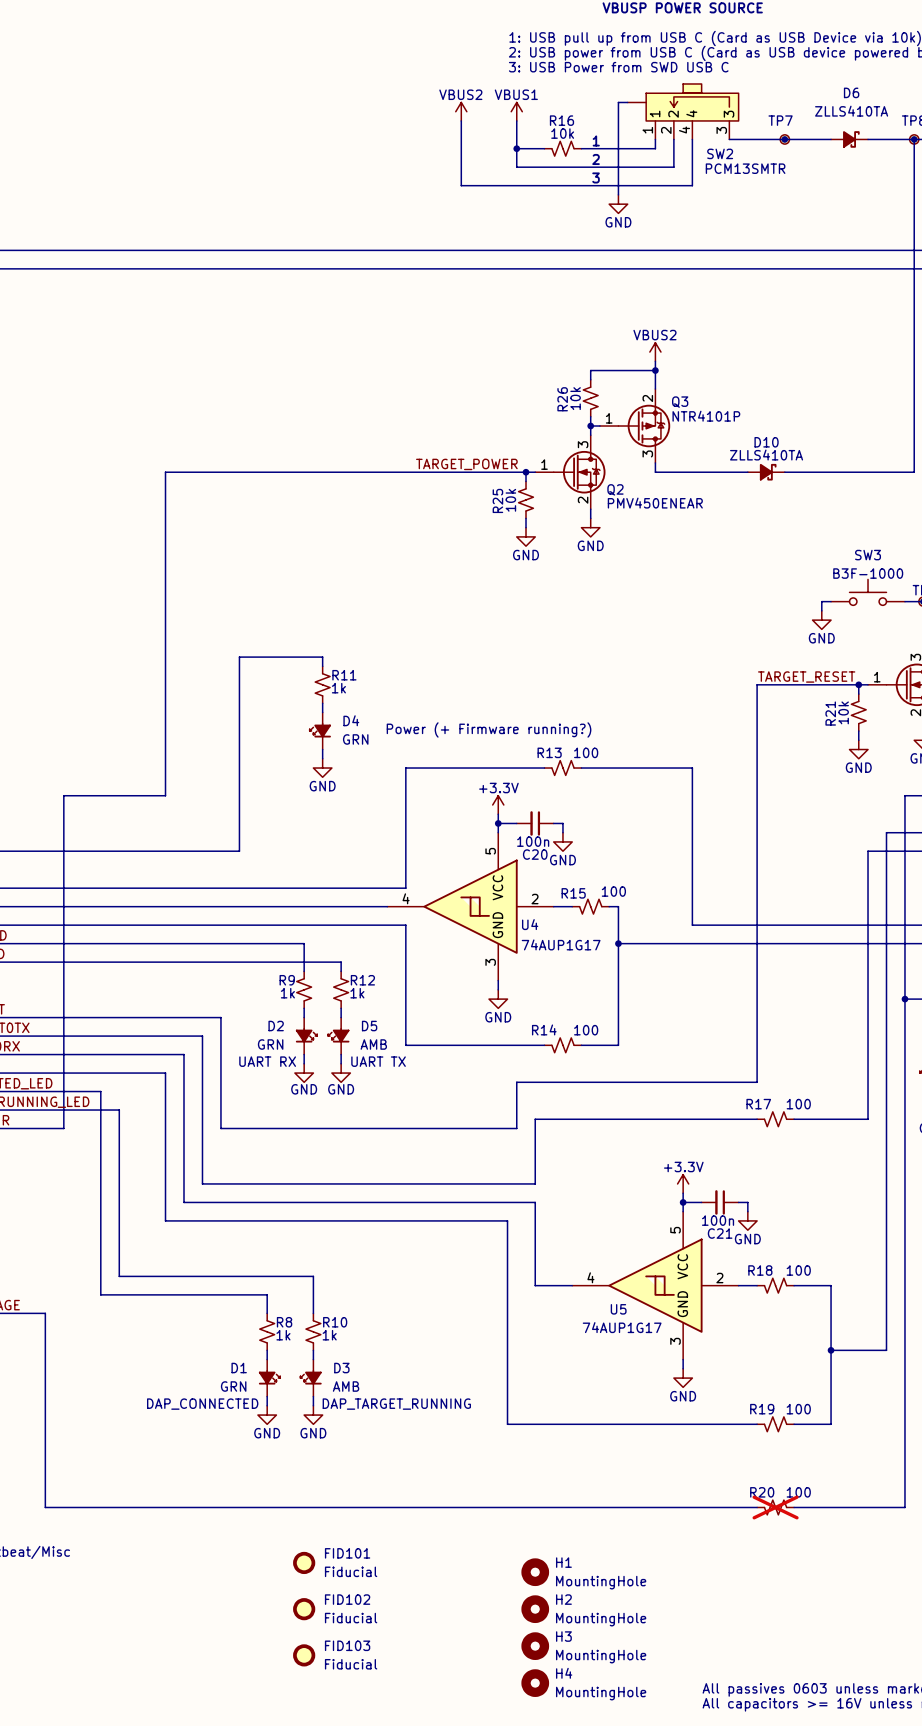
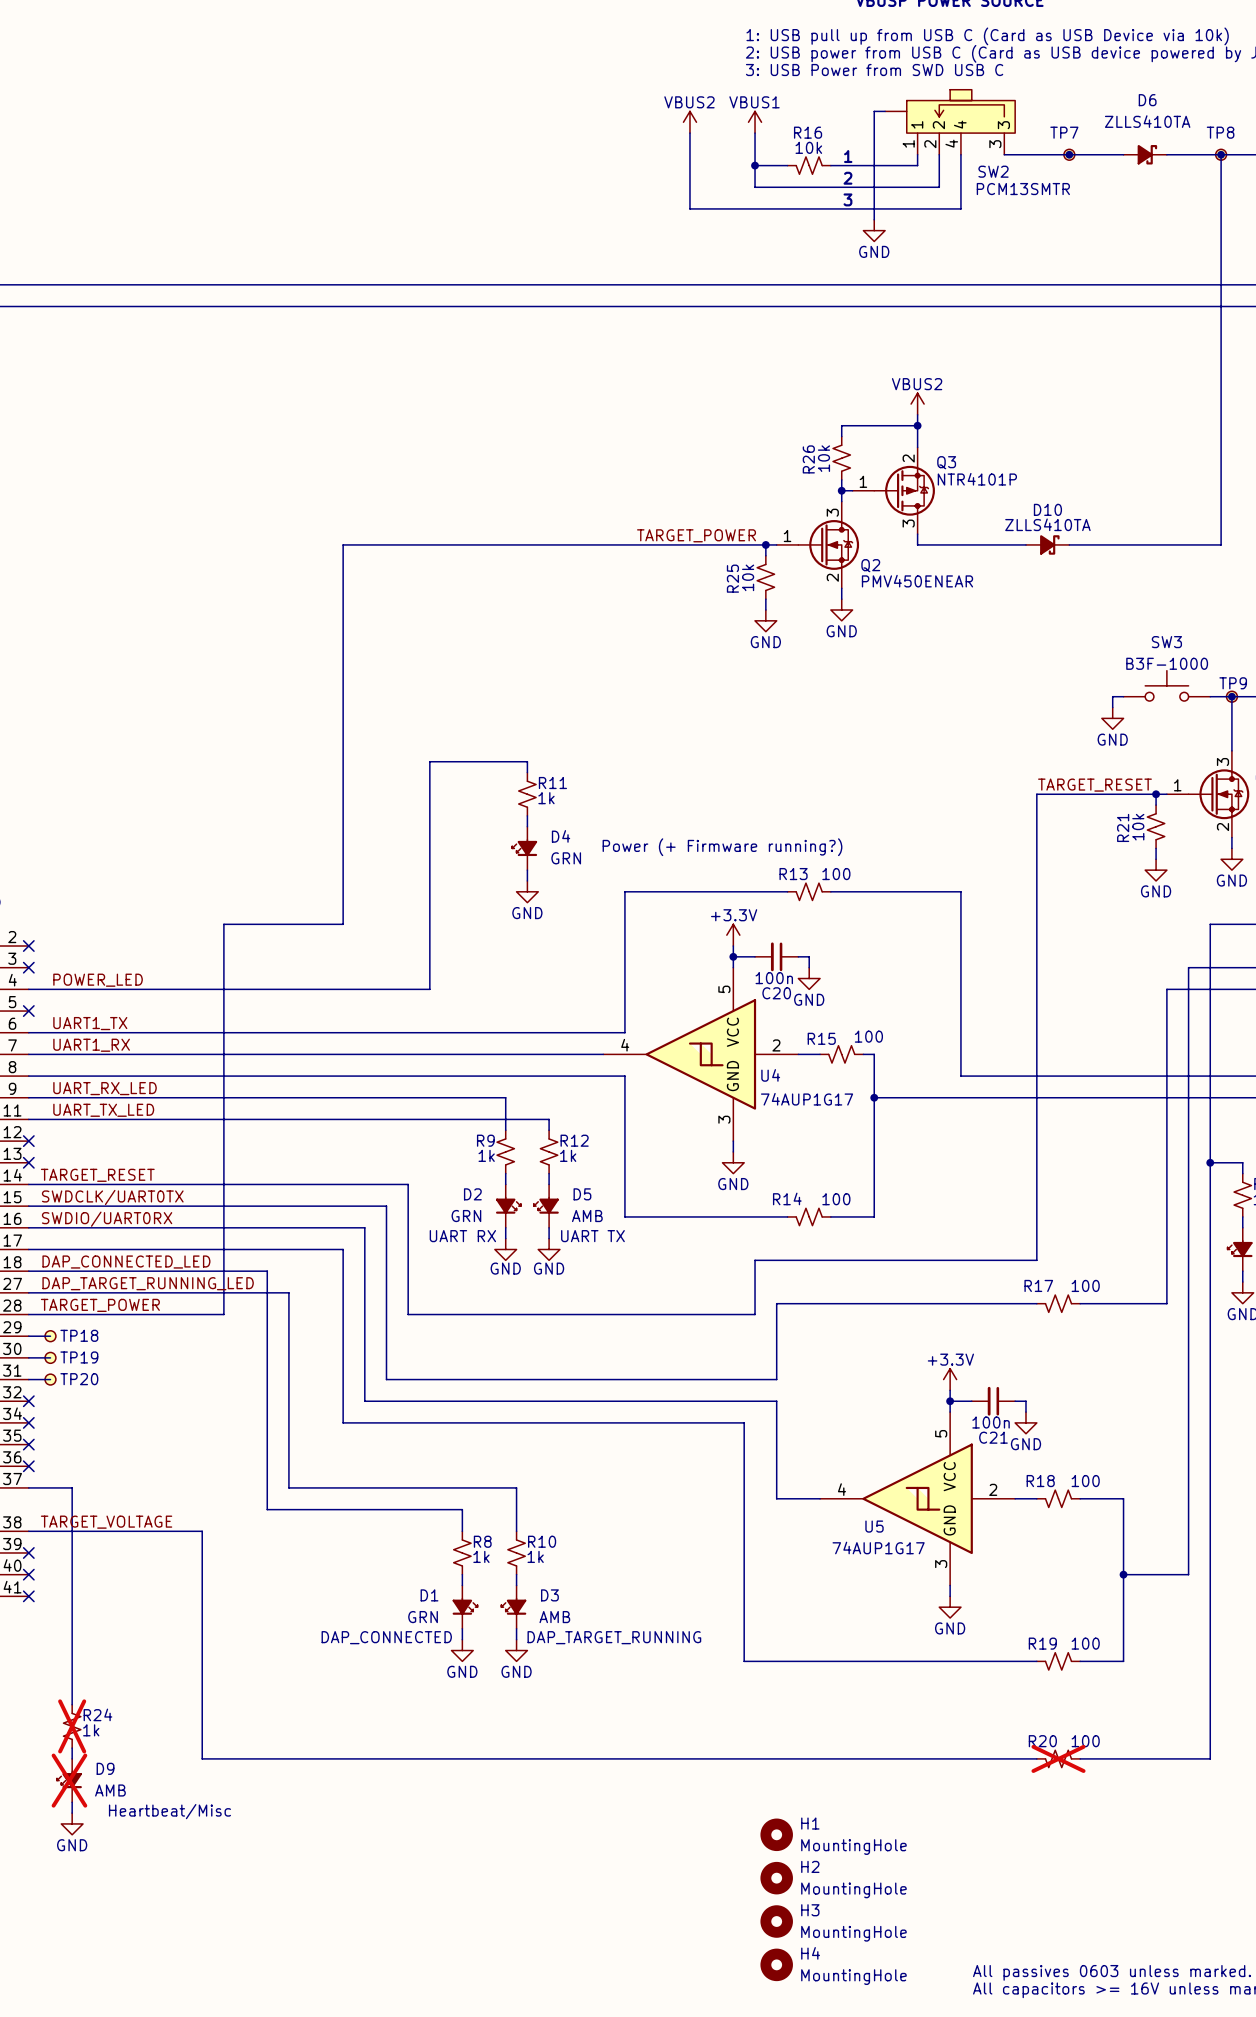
FID101: Fiducial (304, 1562) -> none
FID102: Fiducial (304, 1609) -> none
FID103: Fiducial (304, 1655) -> none

